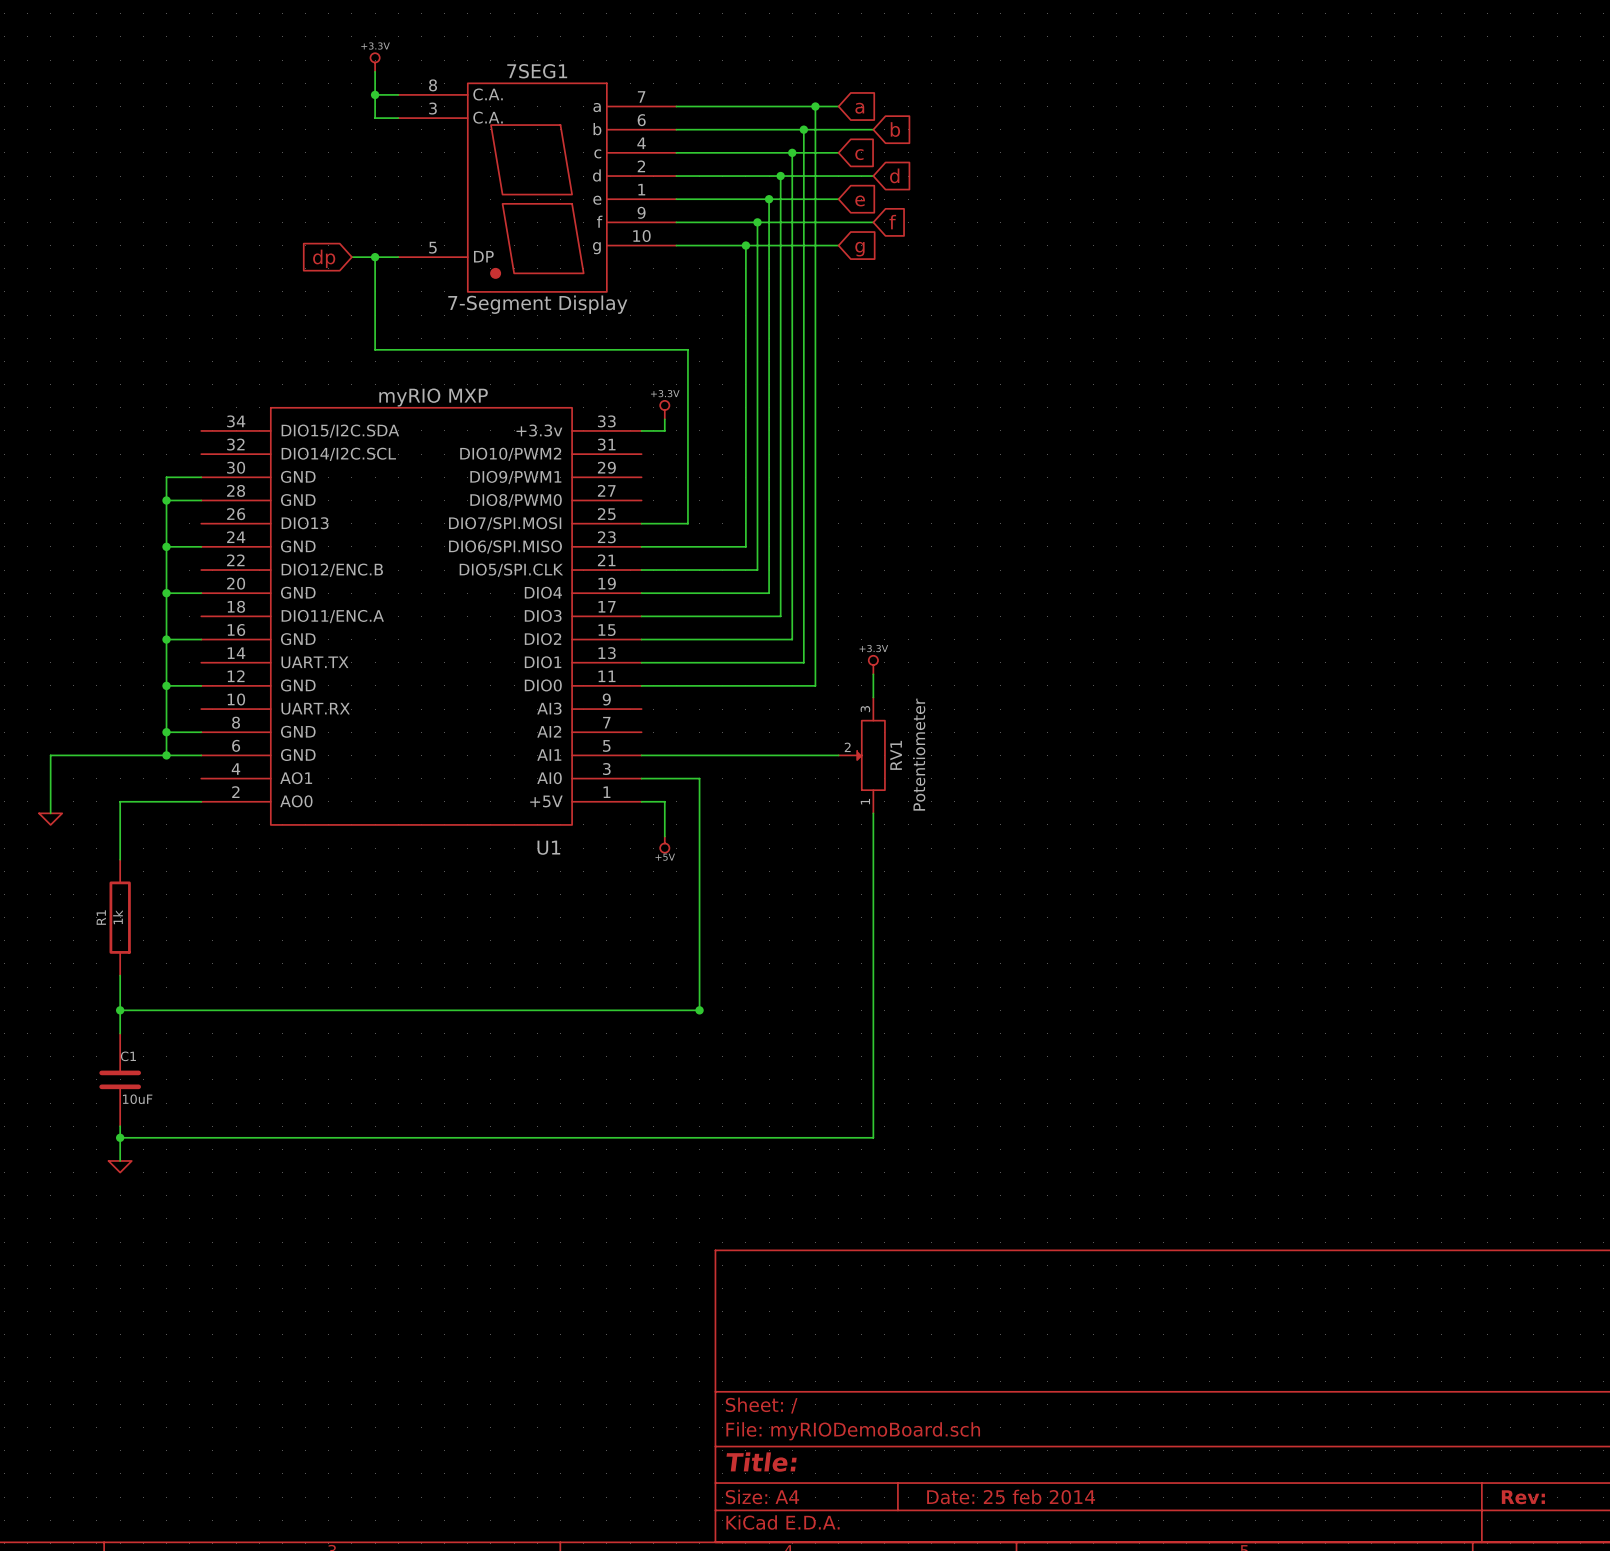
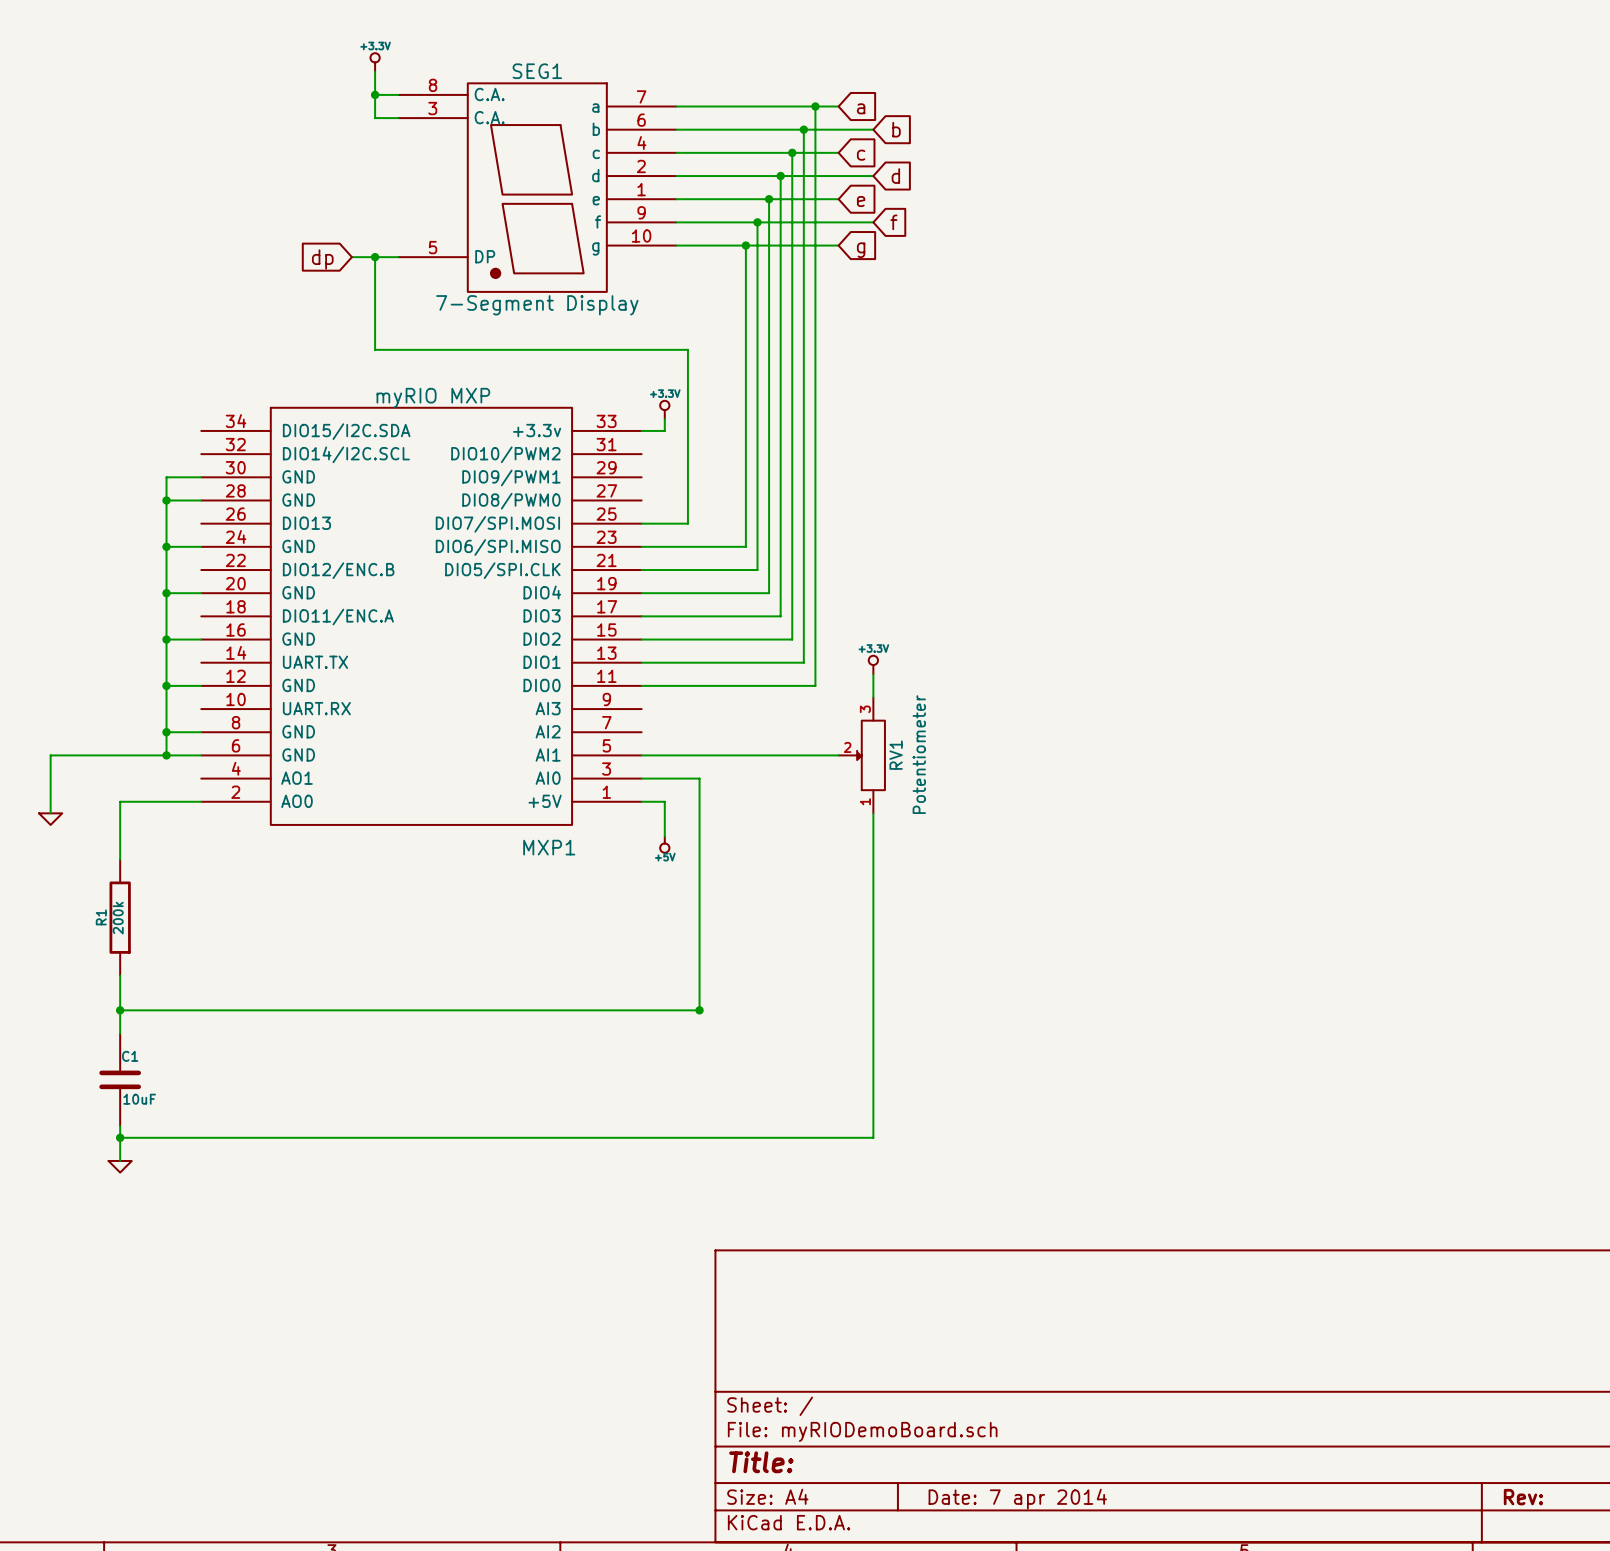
7SEG1 name: 7SEG1 (537, 71) -> SEG1 (537, 71)
U1 name: U1 (548, 847) -> MXP1 (549, 847)
R1 value: 1k (118, 917) -> 200k (118, 918)
title block: Date: 25 feb 2014 (1011, 1496) -> Date: 7 apr 2014 (1017, 1499)

